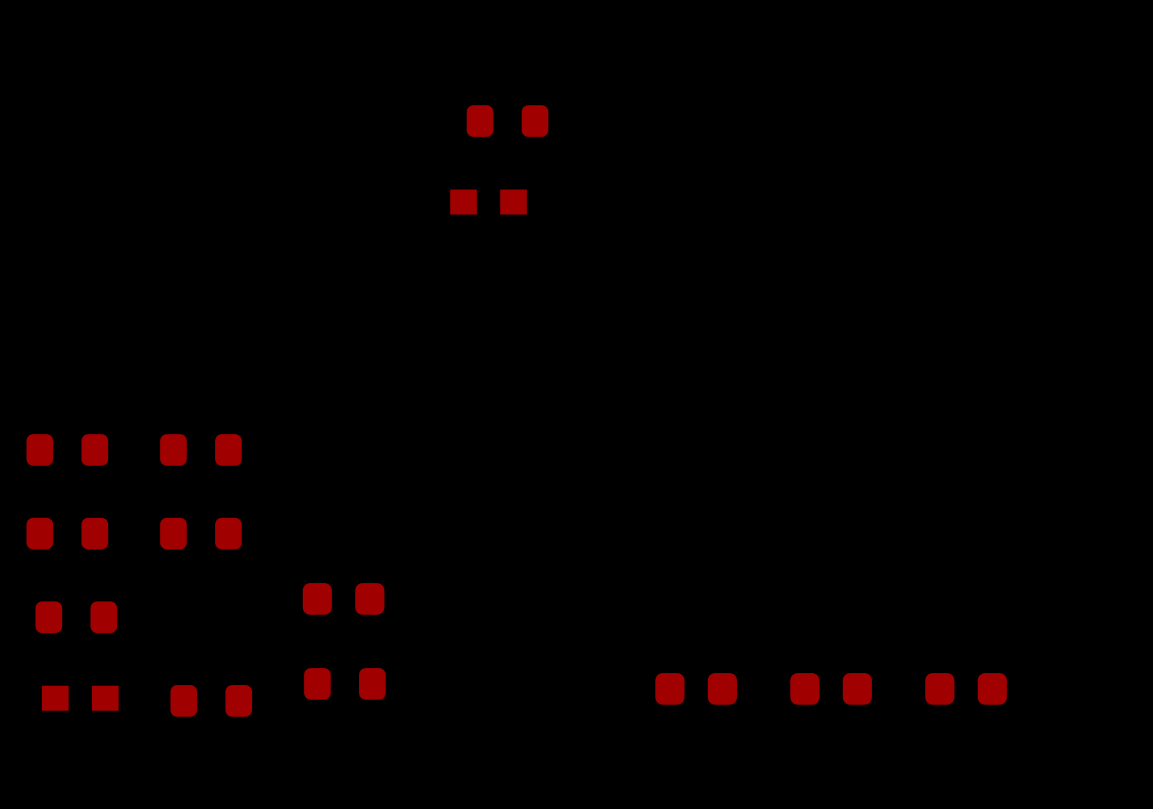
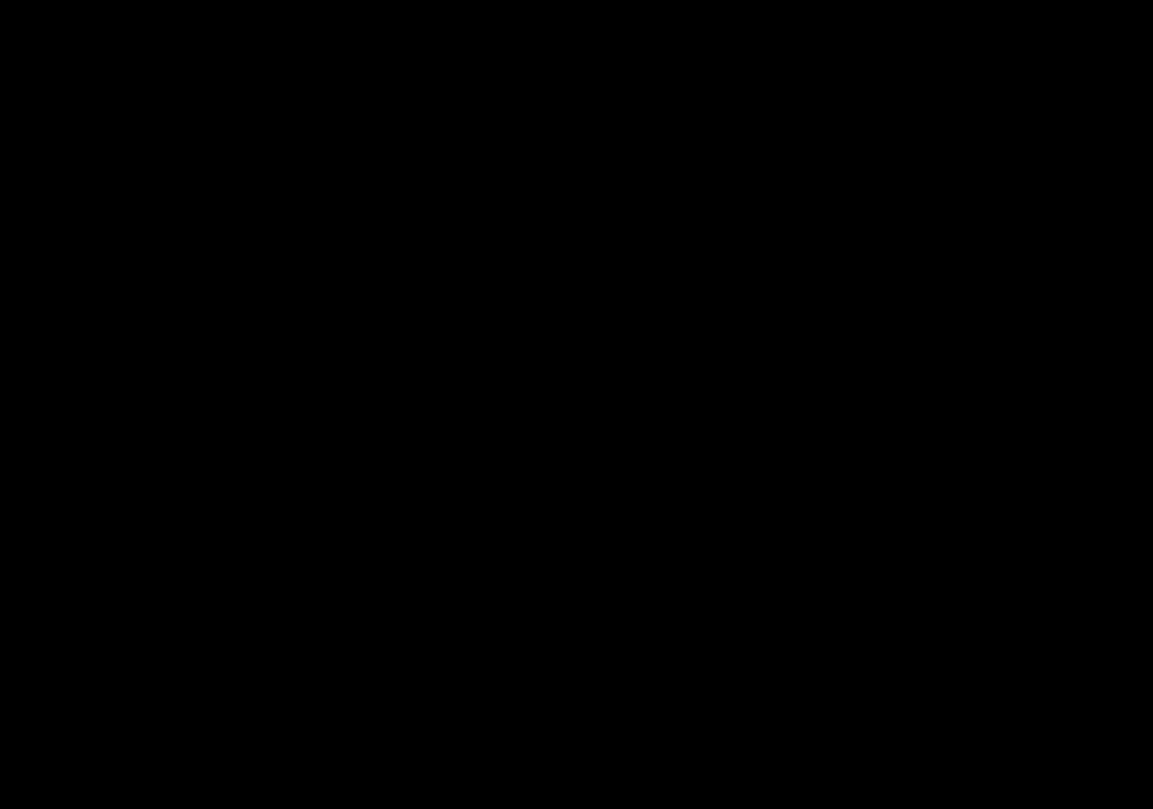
part: (507, 121) -> none
part: (488, 202) -> none
part: (67, 449) -> none
part: (200, 449) -> none
part: (67, 533) -> none
part: (200, 533) -> none
part: (343, 598) -> none
part: (76, 617) -> none
part: (344, 683) -> none
part: (696, 688) -> none
part: (831, 688) -> none
part: (966, 688) -> none
part: (80, 698) -> none
part: (211, 700) -> none

